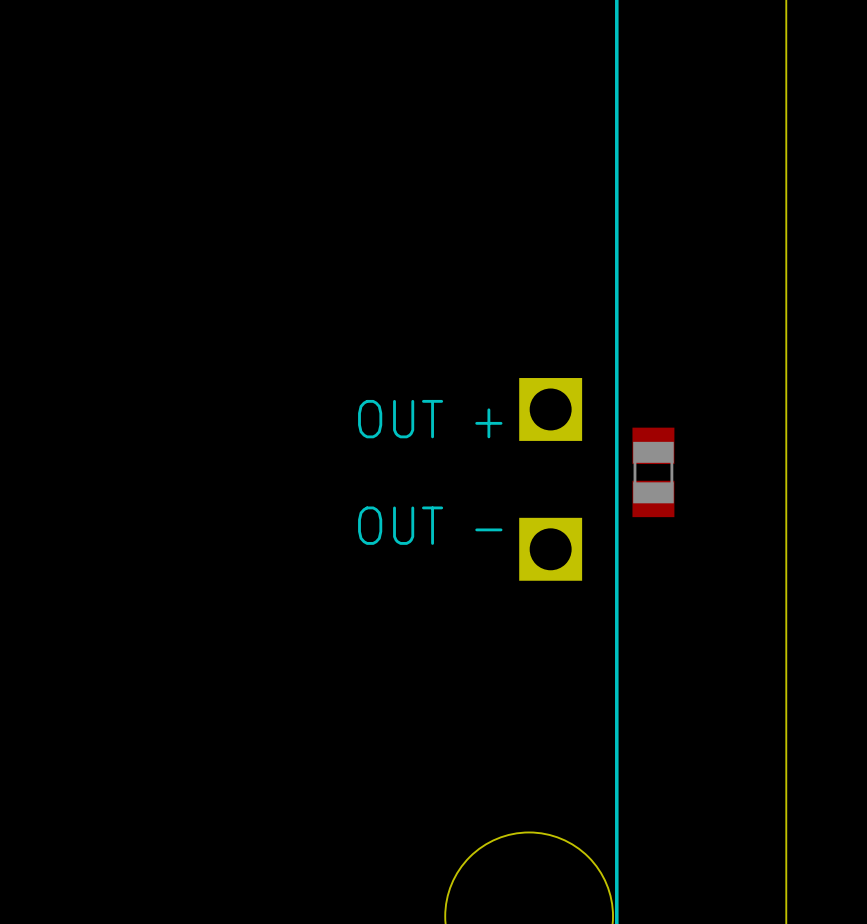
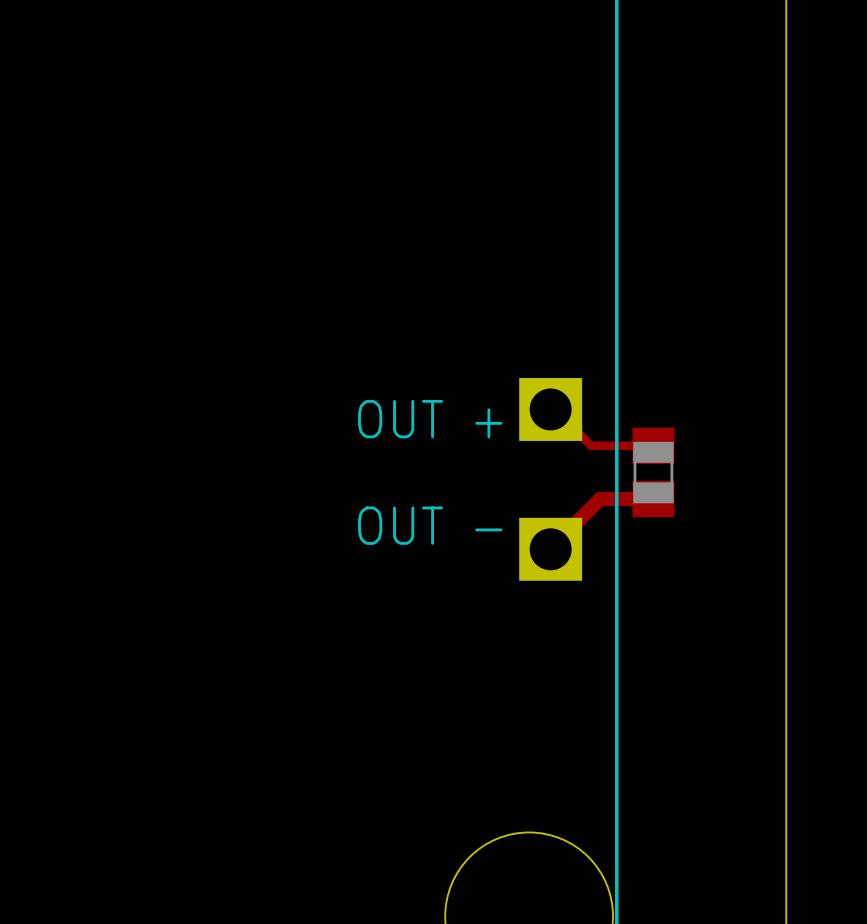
track: none -> (550, 409) (555, 410) (591, 445) (653, 445)
track: none -> (653, 499) (600, 499) (550, 549)

